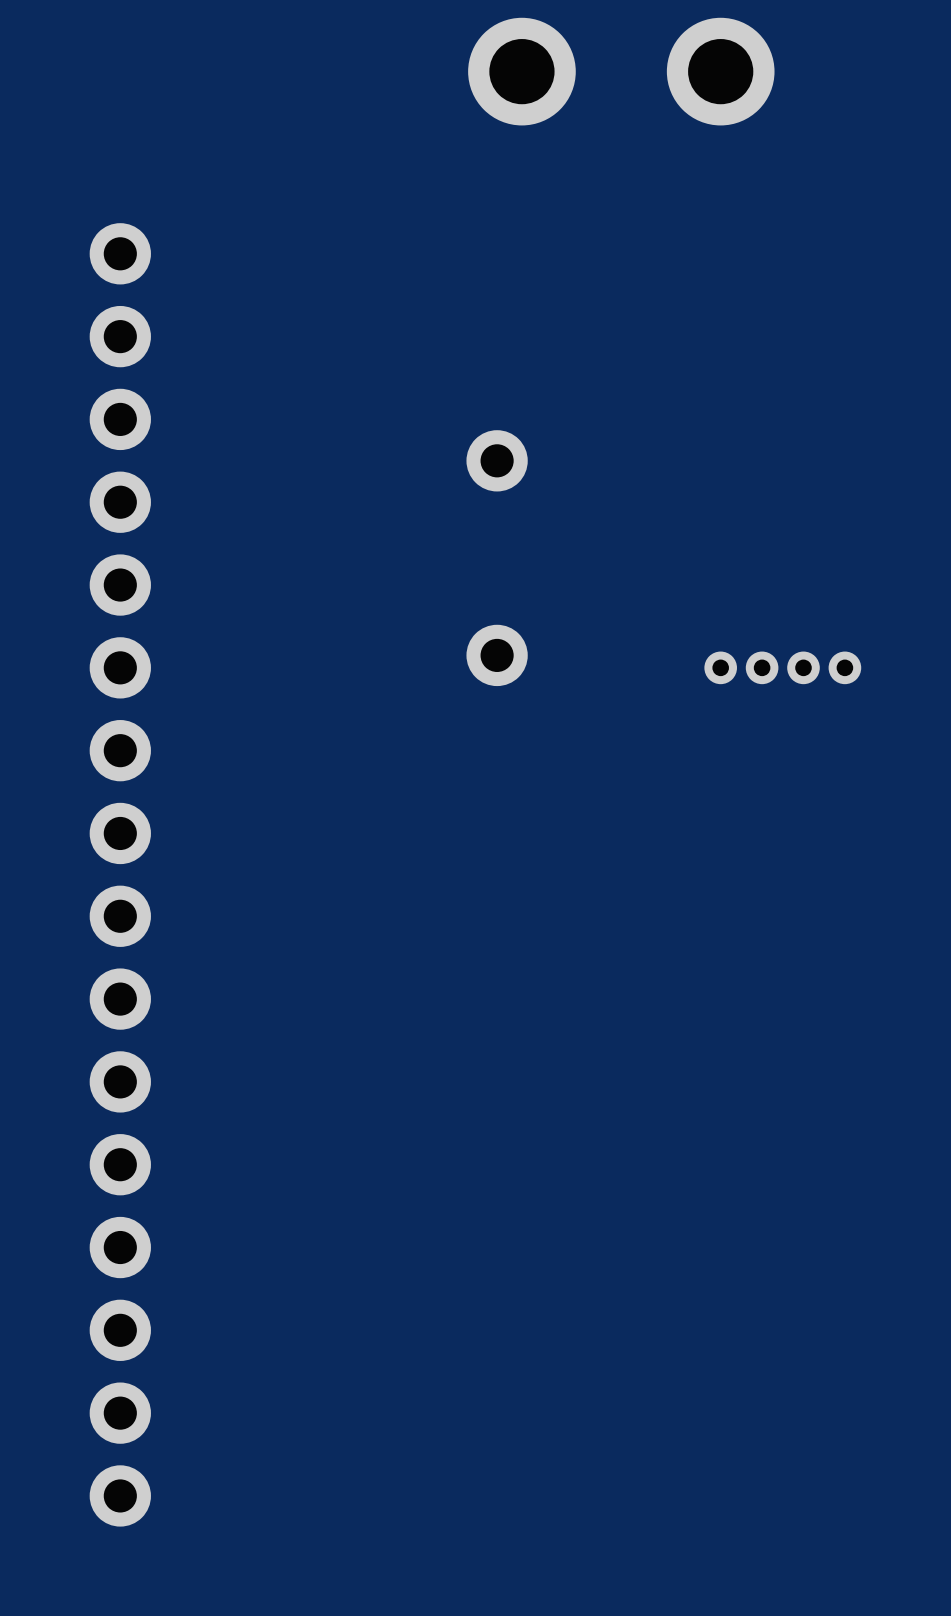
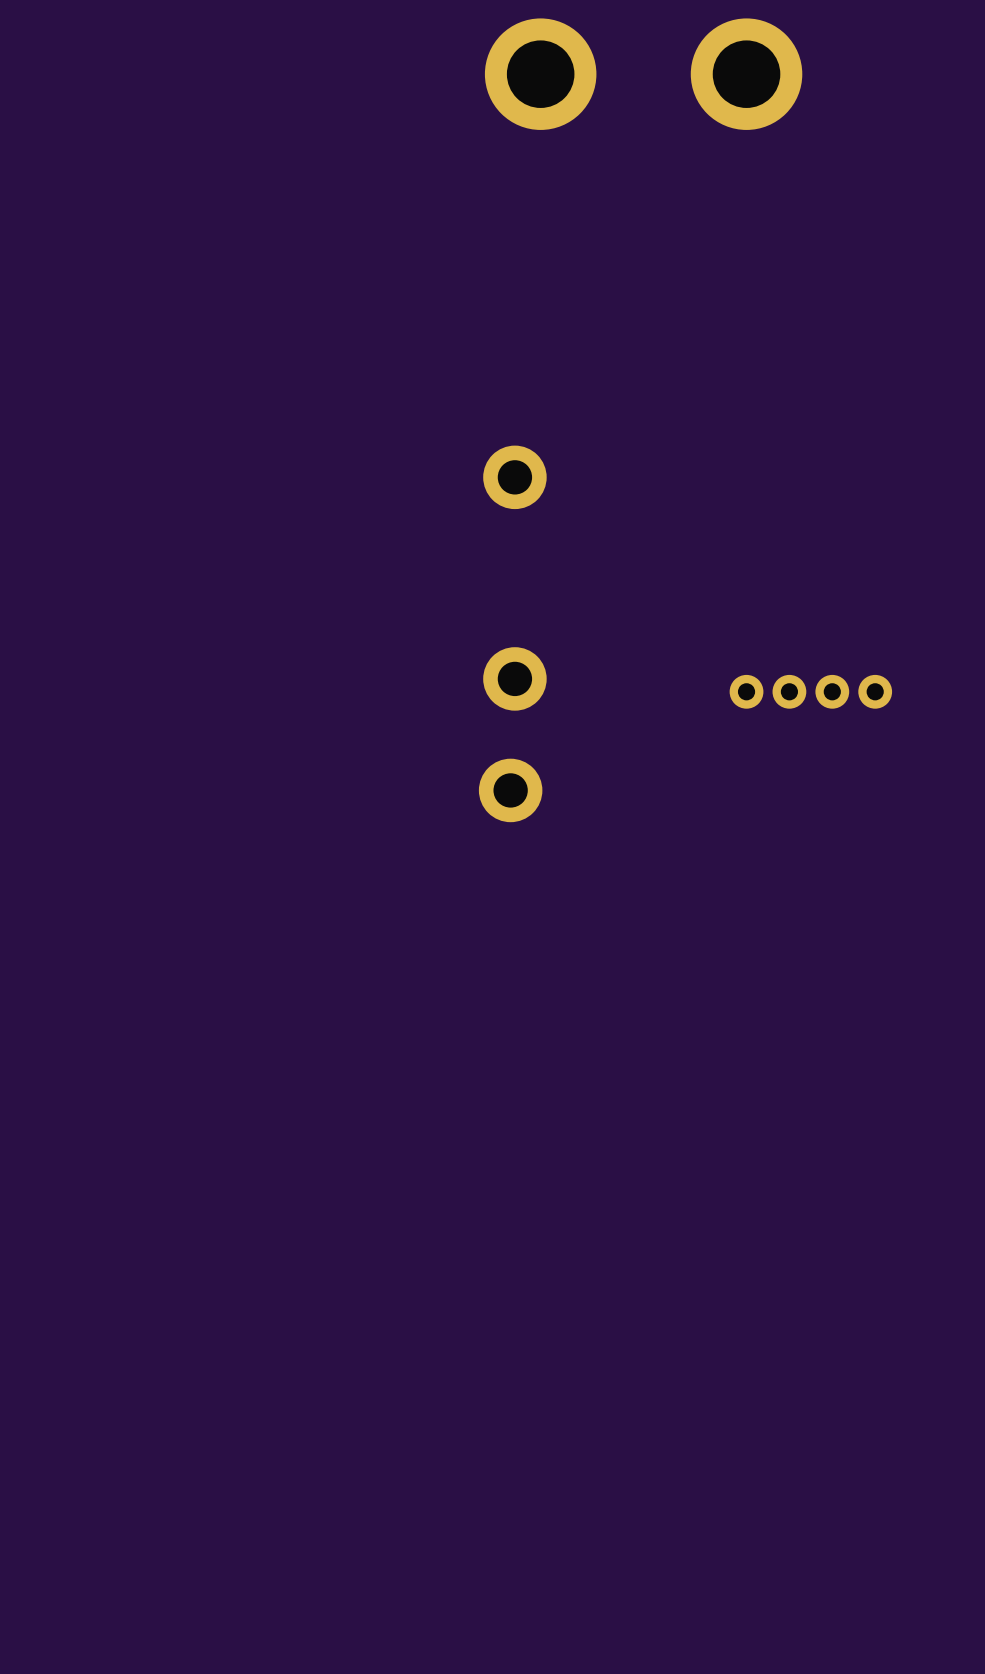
part: none -> (510, 790)
part: (120, 874) -> none

